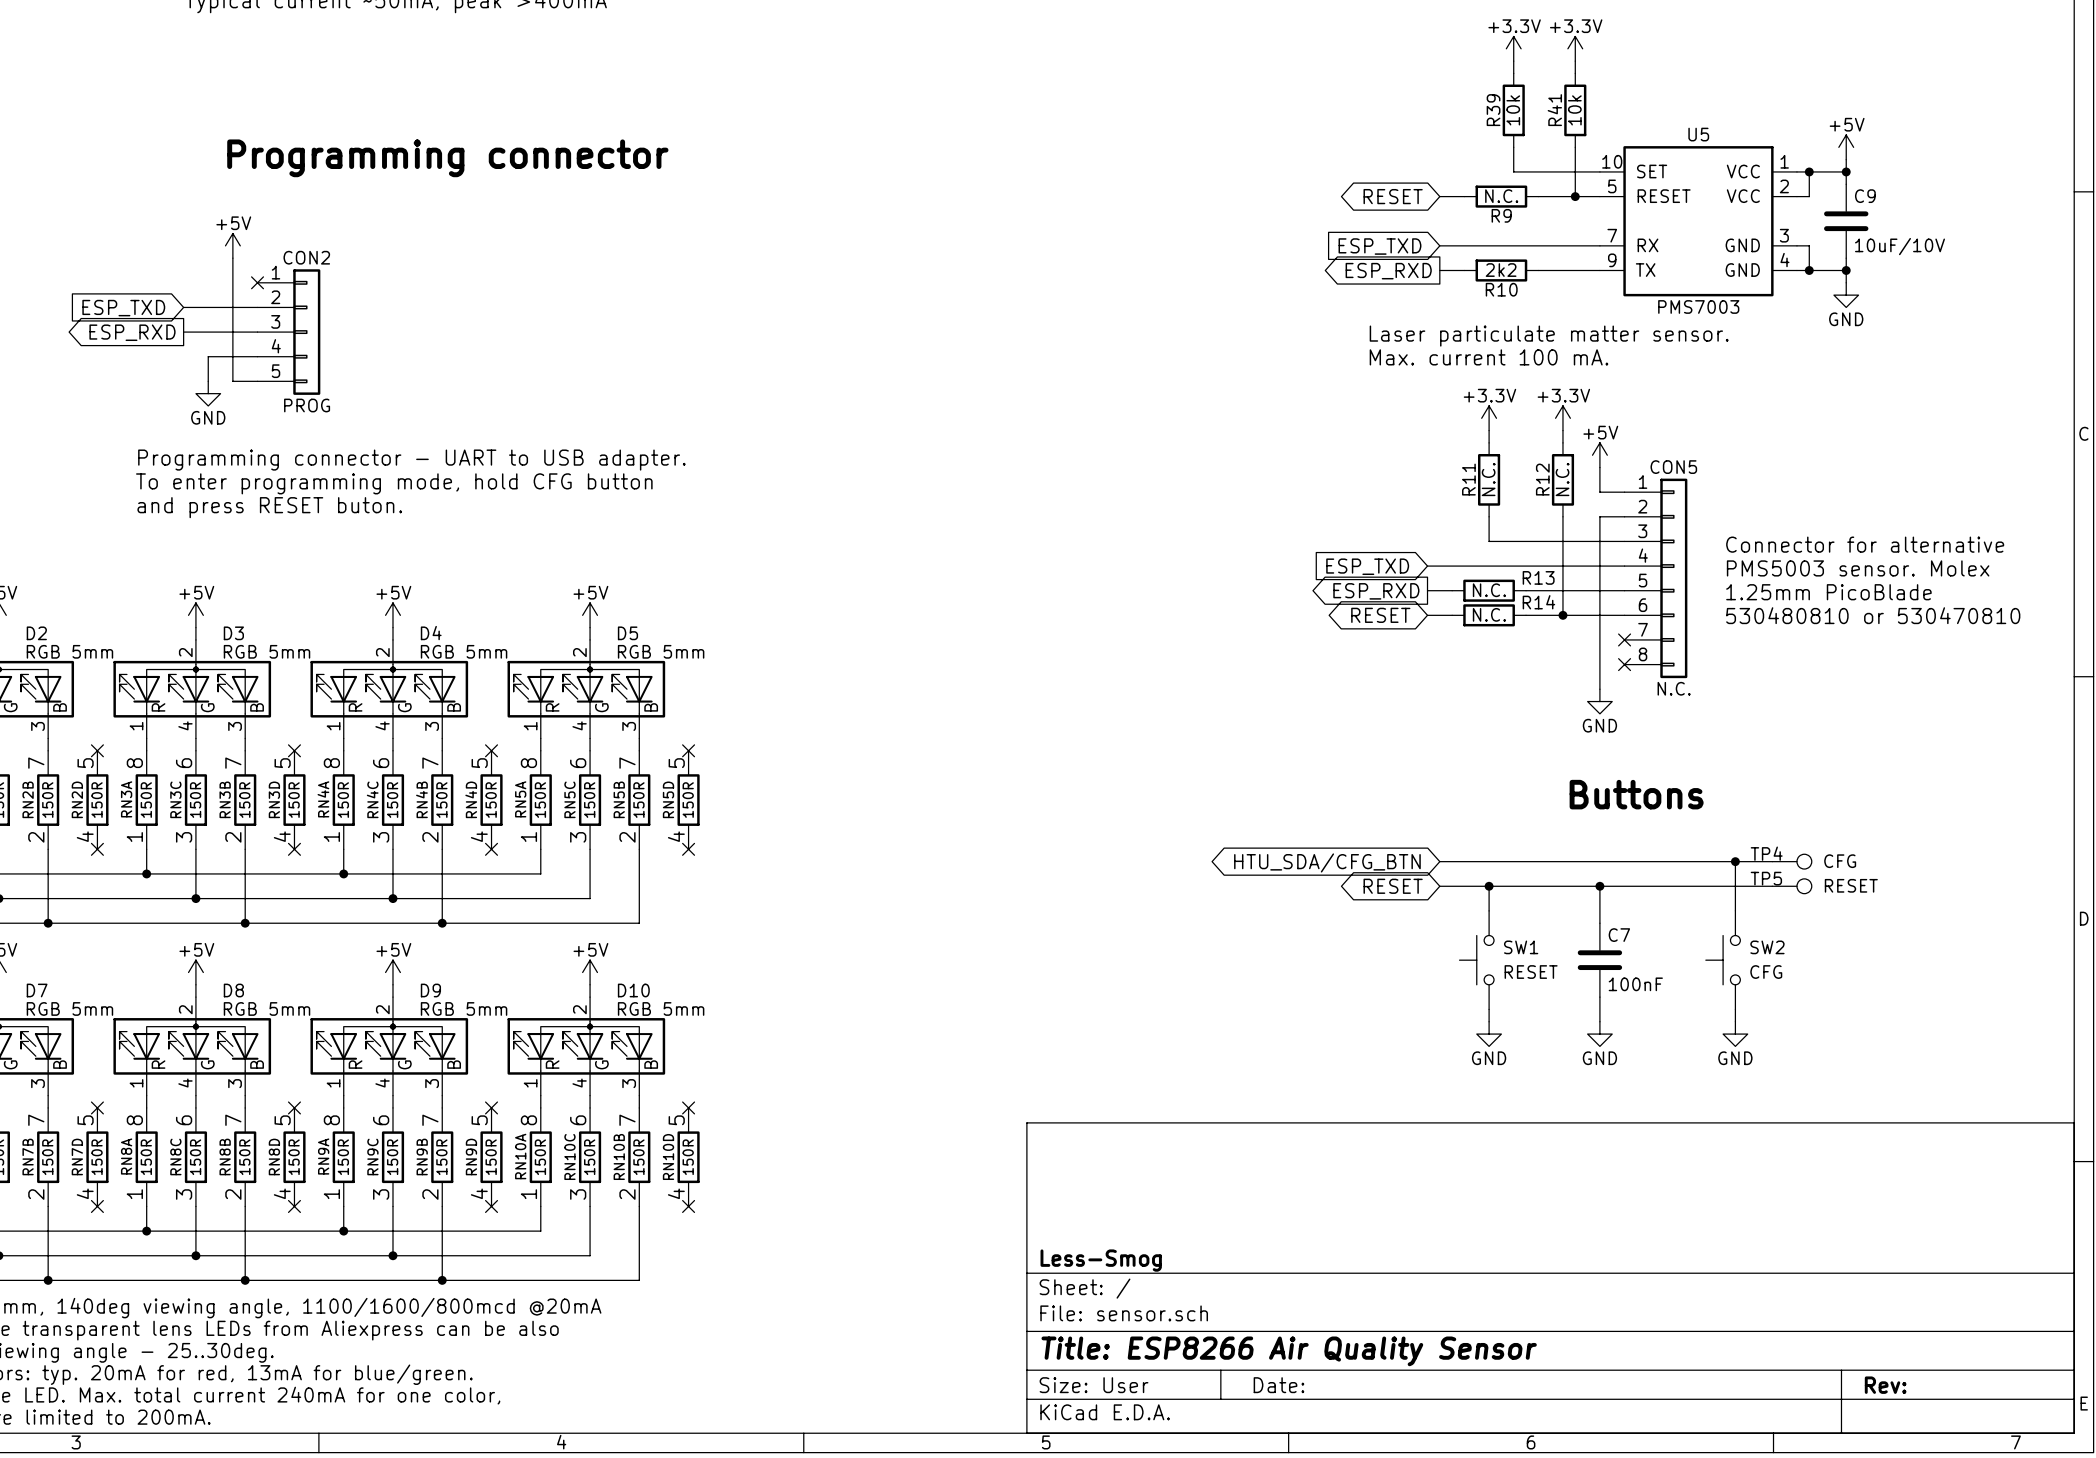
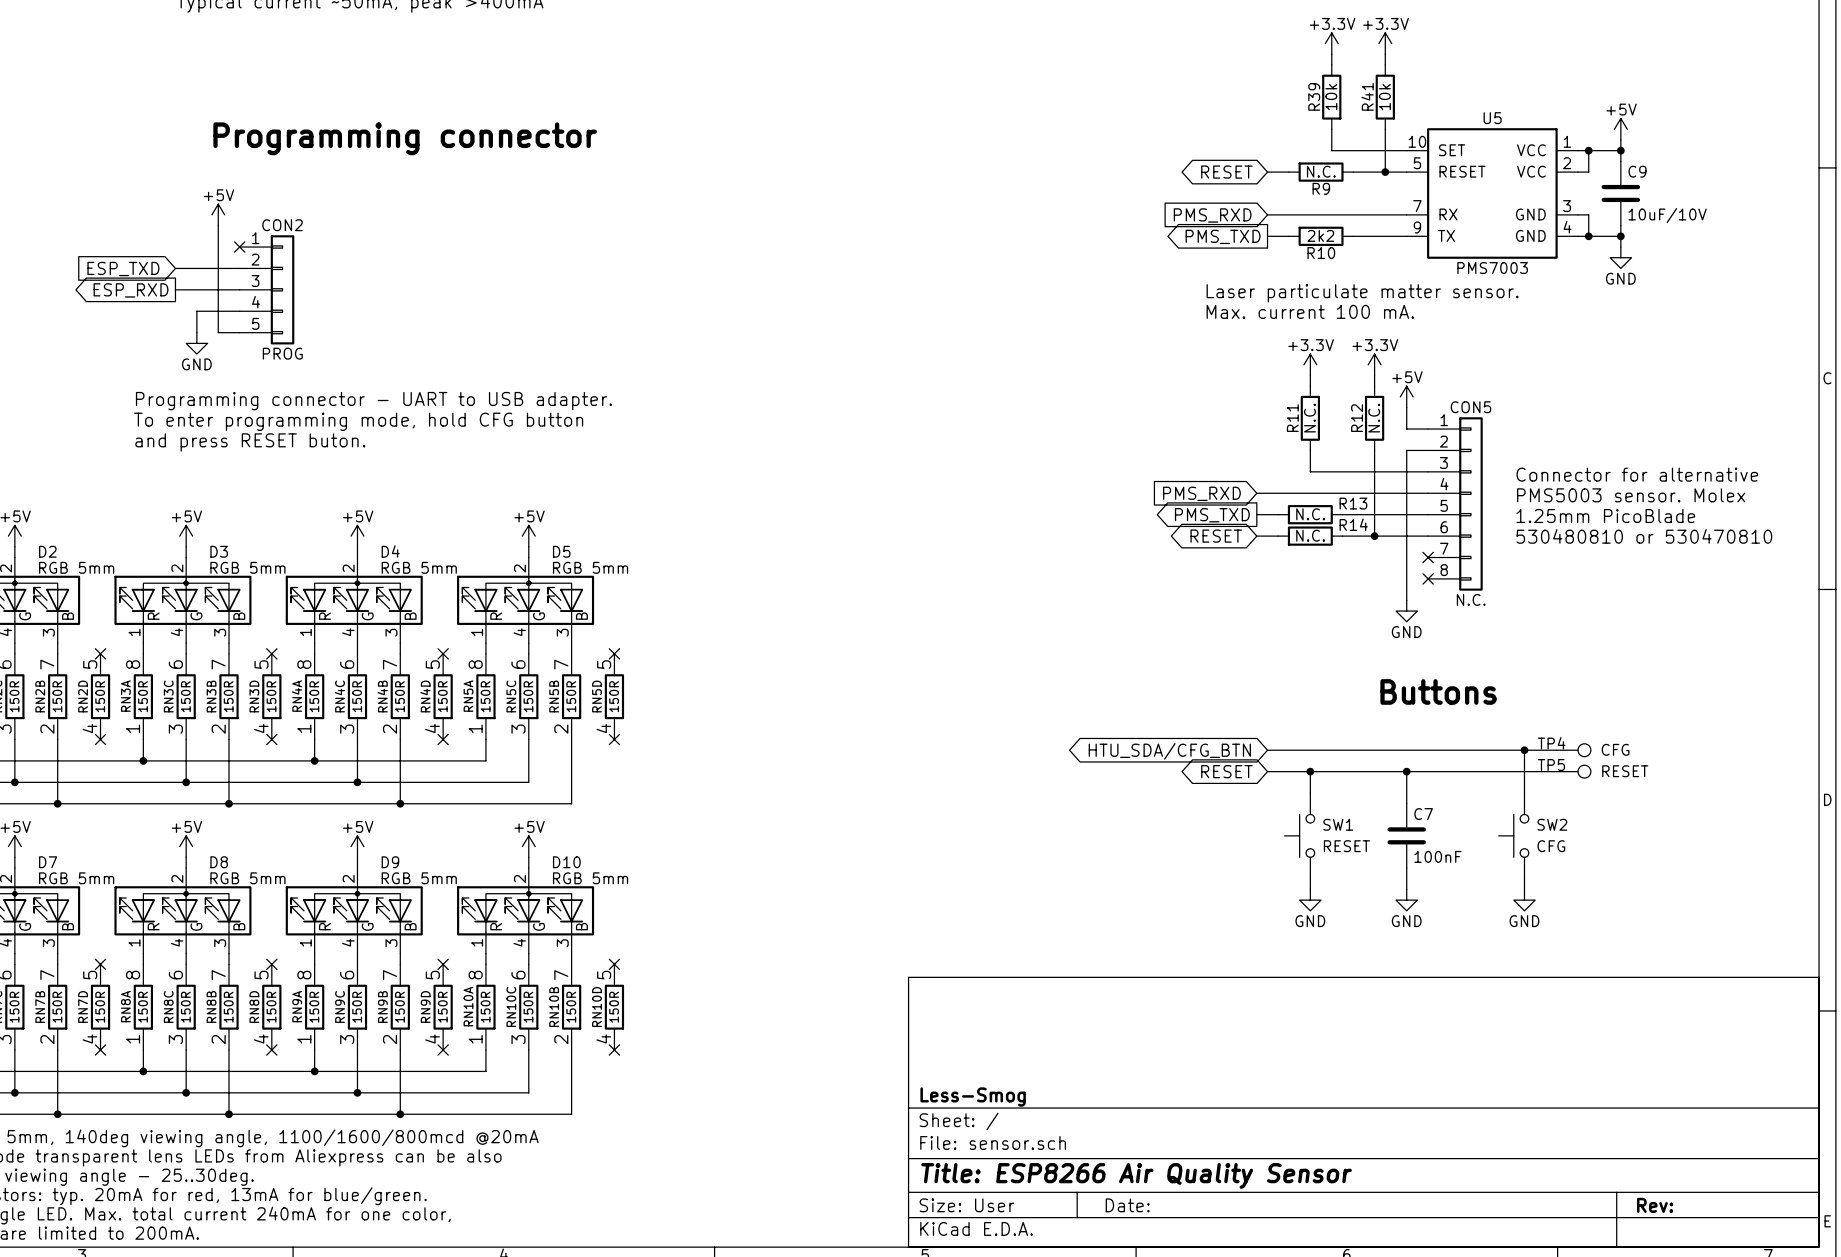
global label: ESP_TXD (1379, 246) -> PMS_RXD (1212, 215)
global label: ESP_RXD (1388, 271) -> PMS_TXD (1223, 236)
global label: ESP_TXD (1367, 566) -> PMS_RXD (1201, 493)
global label: ESP_RXD (1376, 591) -> PMS_TXD (1212, 515)

